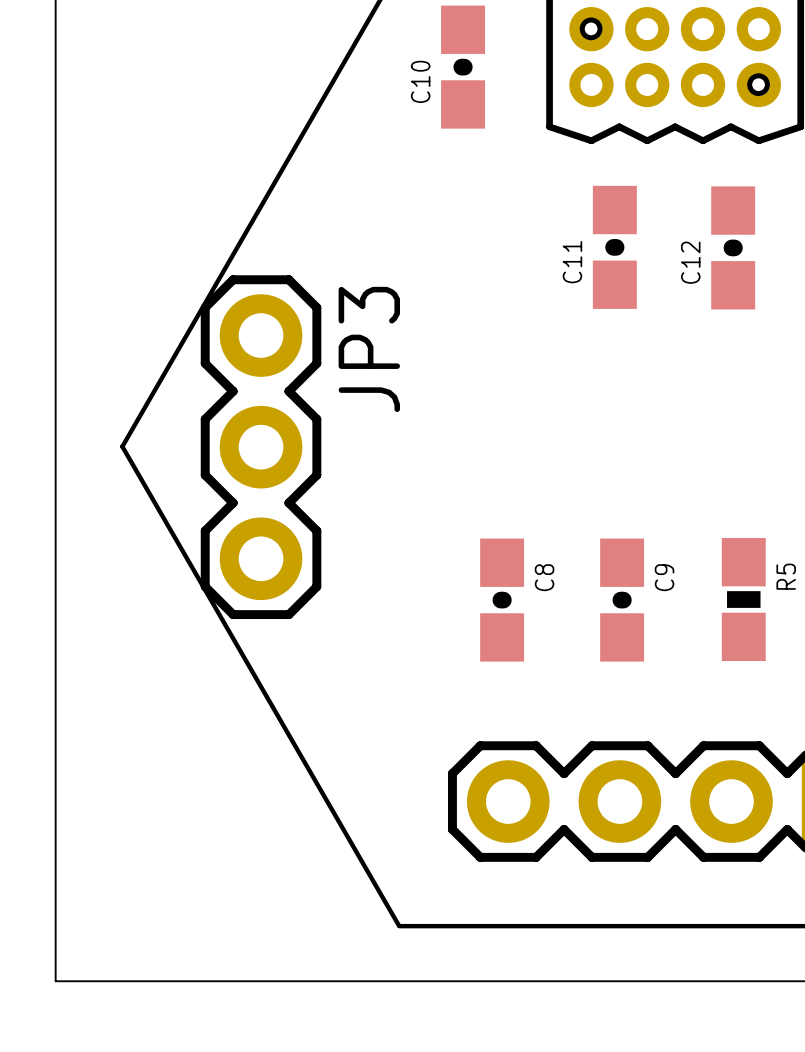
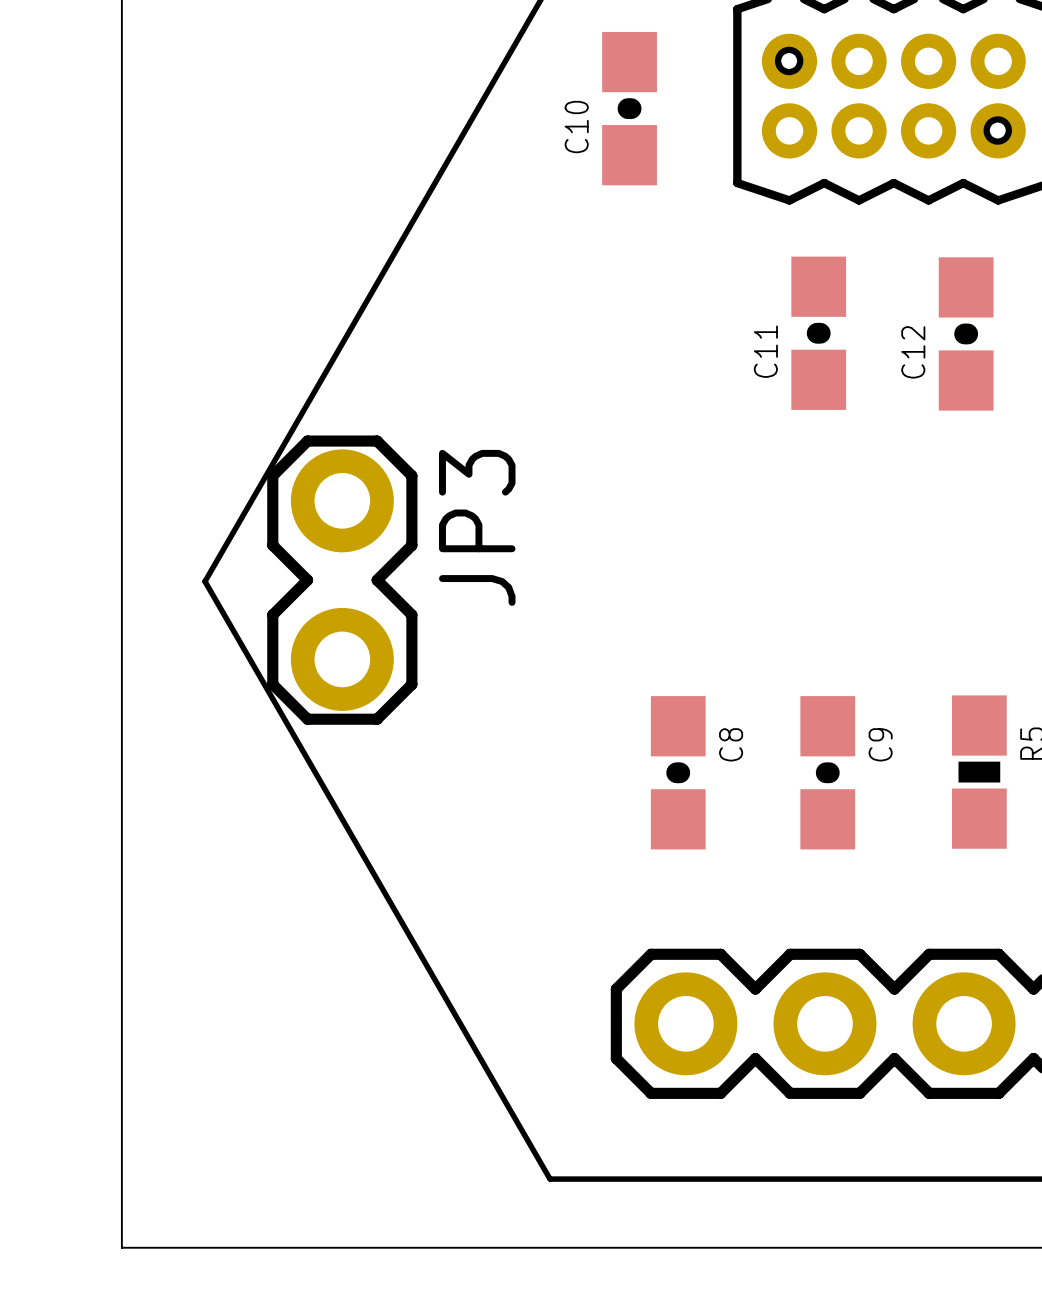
JP3 footprint: [200, 275, 322, 620] -> [267, 435, 418, 725]

